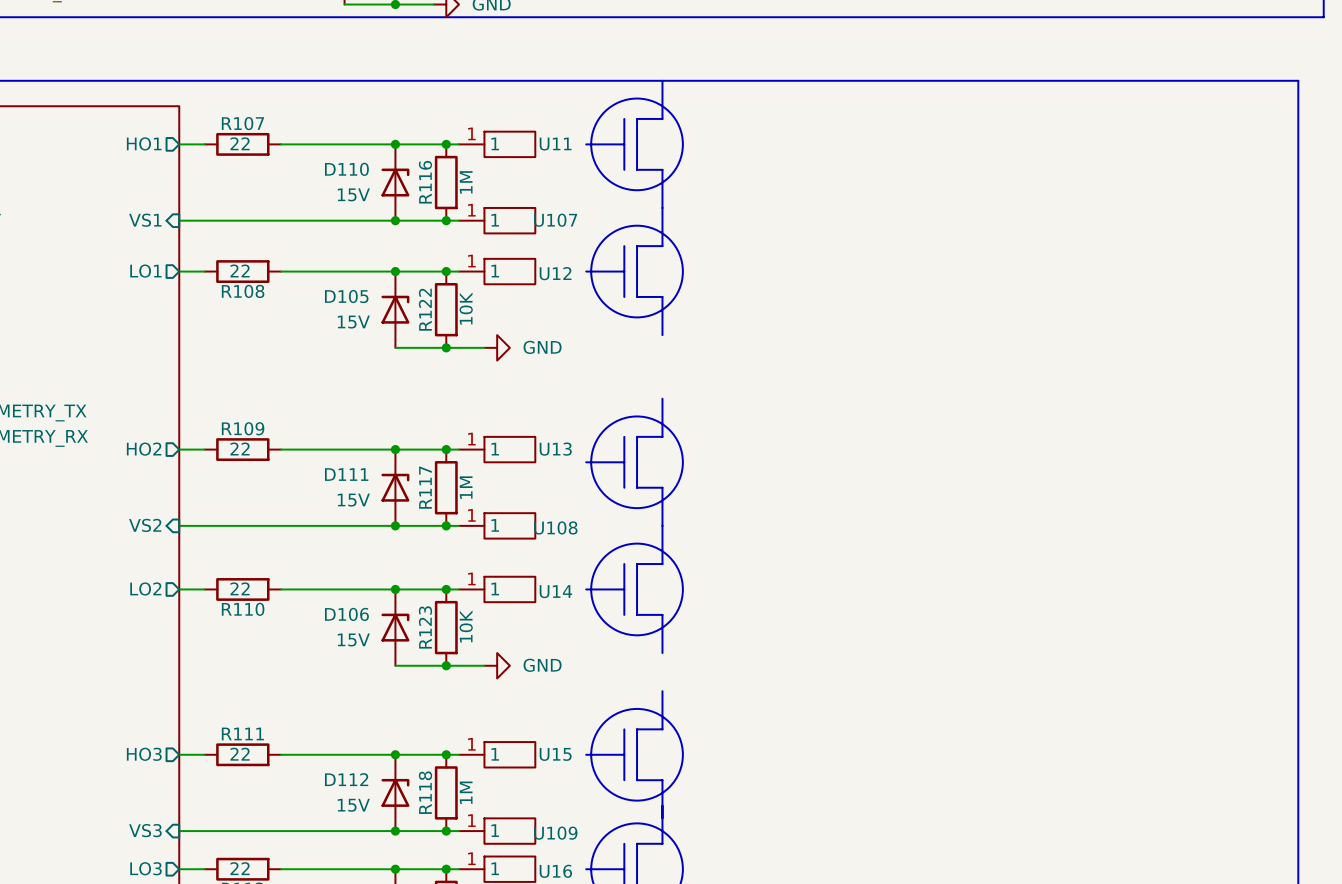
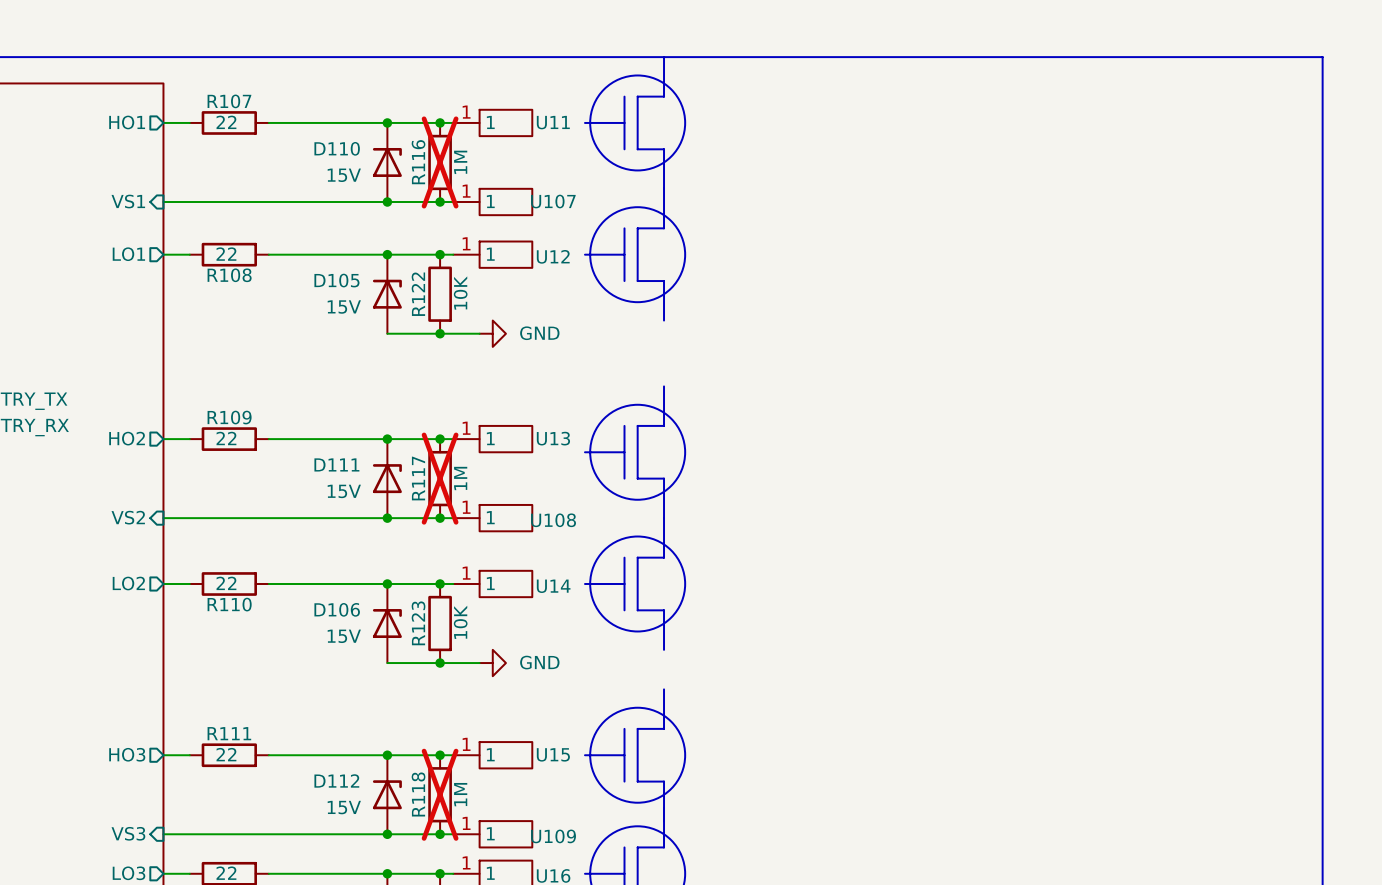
R116 do-not-place cross: none -> (440, 162)
R117 do-not-place cross: none -> (440, 478)
R118 do-not-place cross: none -> (440, 794)

